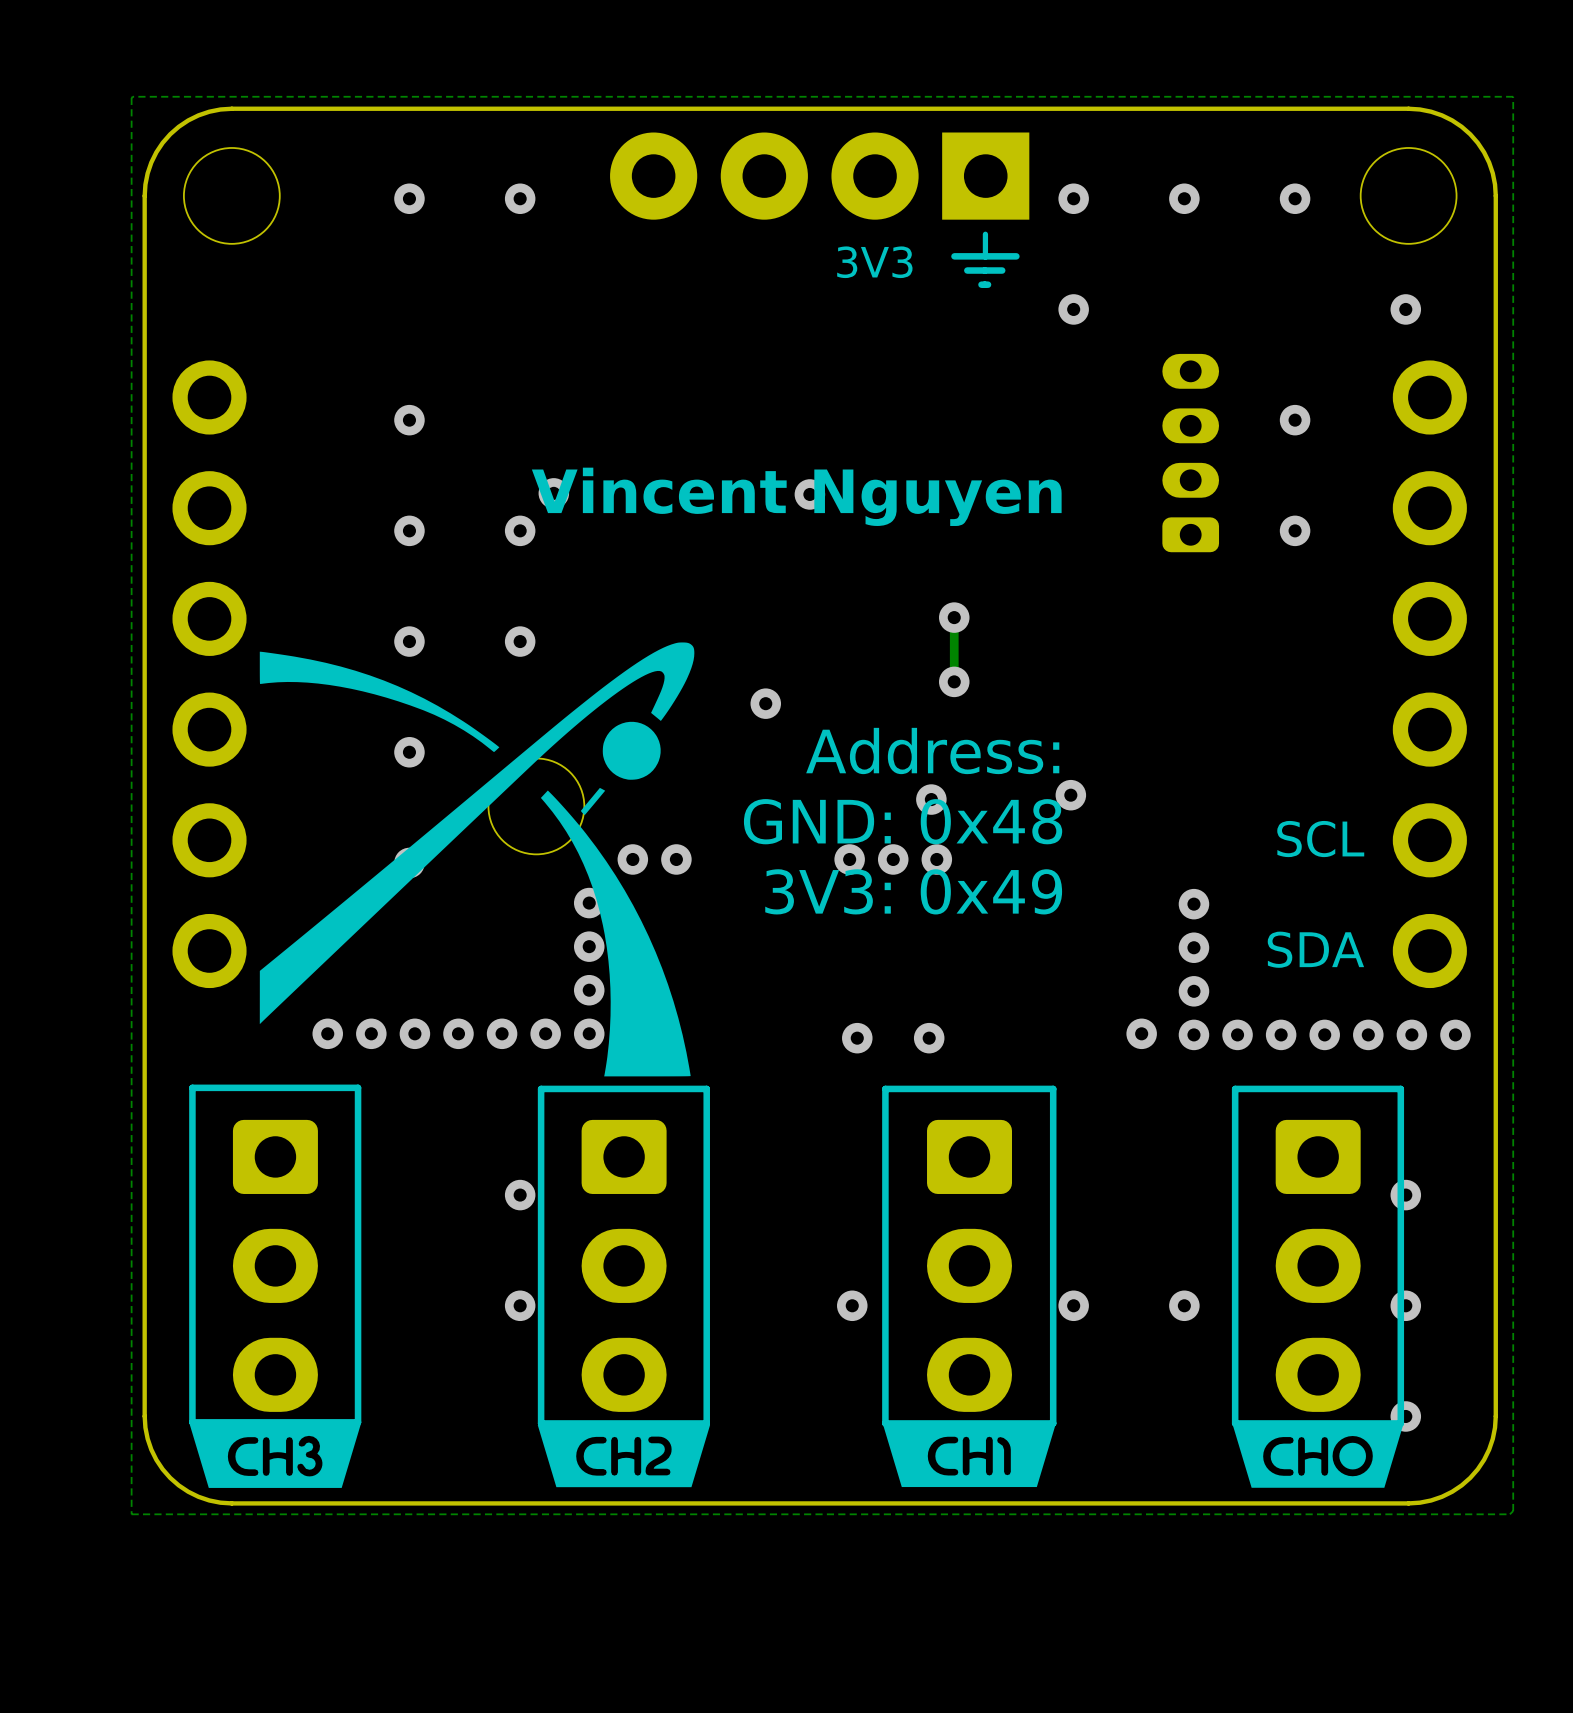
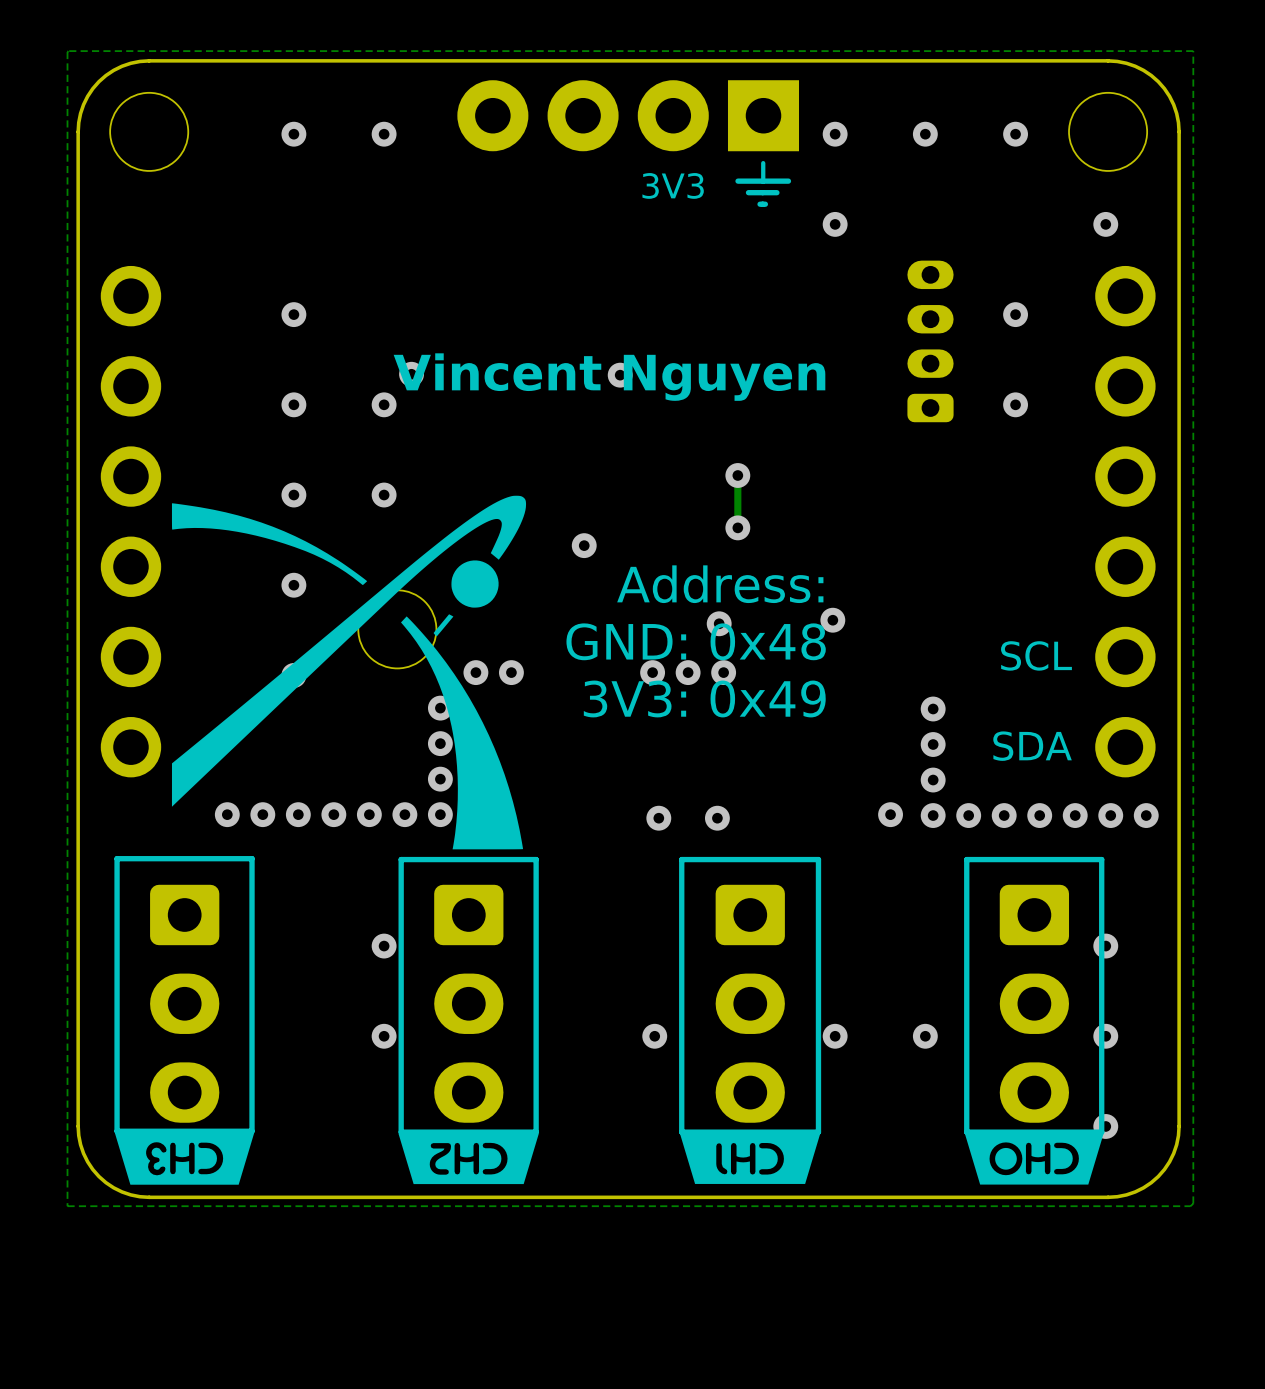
drawing shape: [189, 1424, 361, 1488] -> [114, 1132, 255, 1185]
drawing shape: [1232, 1424, 1404, 1488] -> [964, 1132, 1104, 1185]
drawing shape: [537, 1425, 711, 1488] -> [398, 1133, 539, 1185]
drawing shape: [883, 1425, 1056, 1488] -> [679, 1133, 821, 1184]

